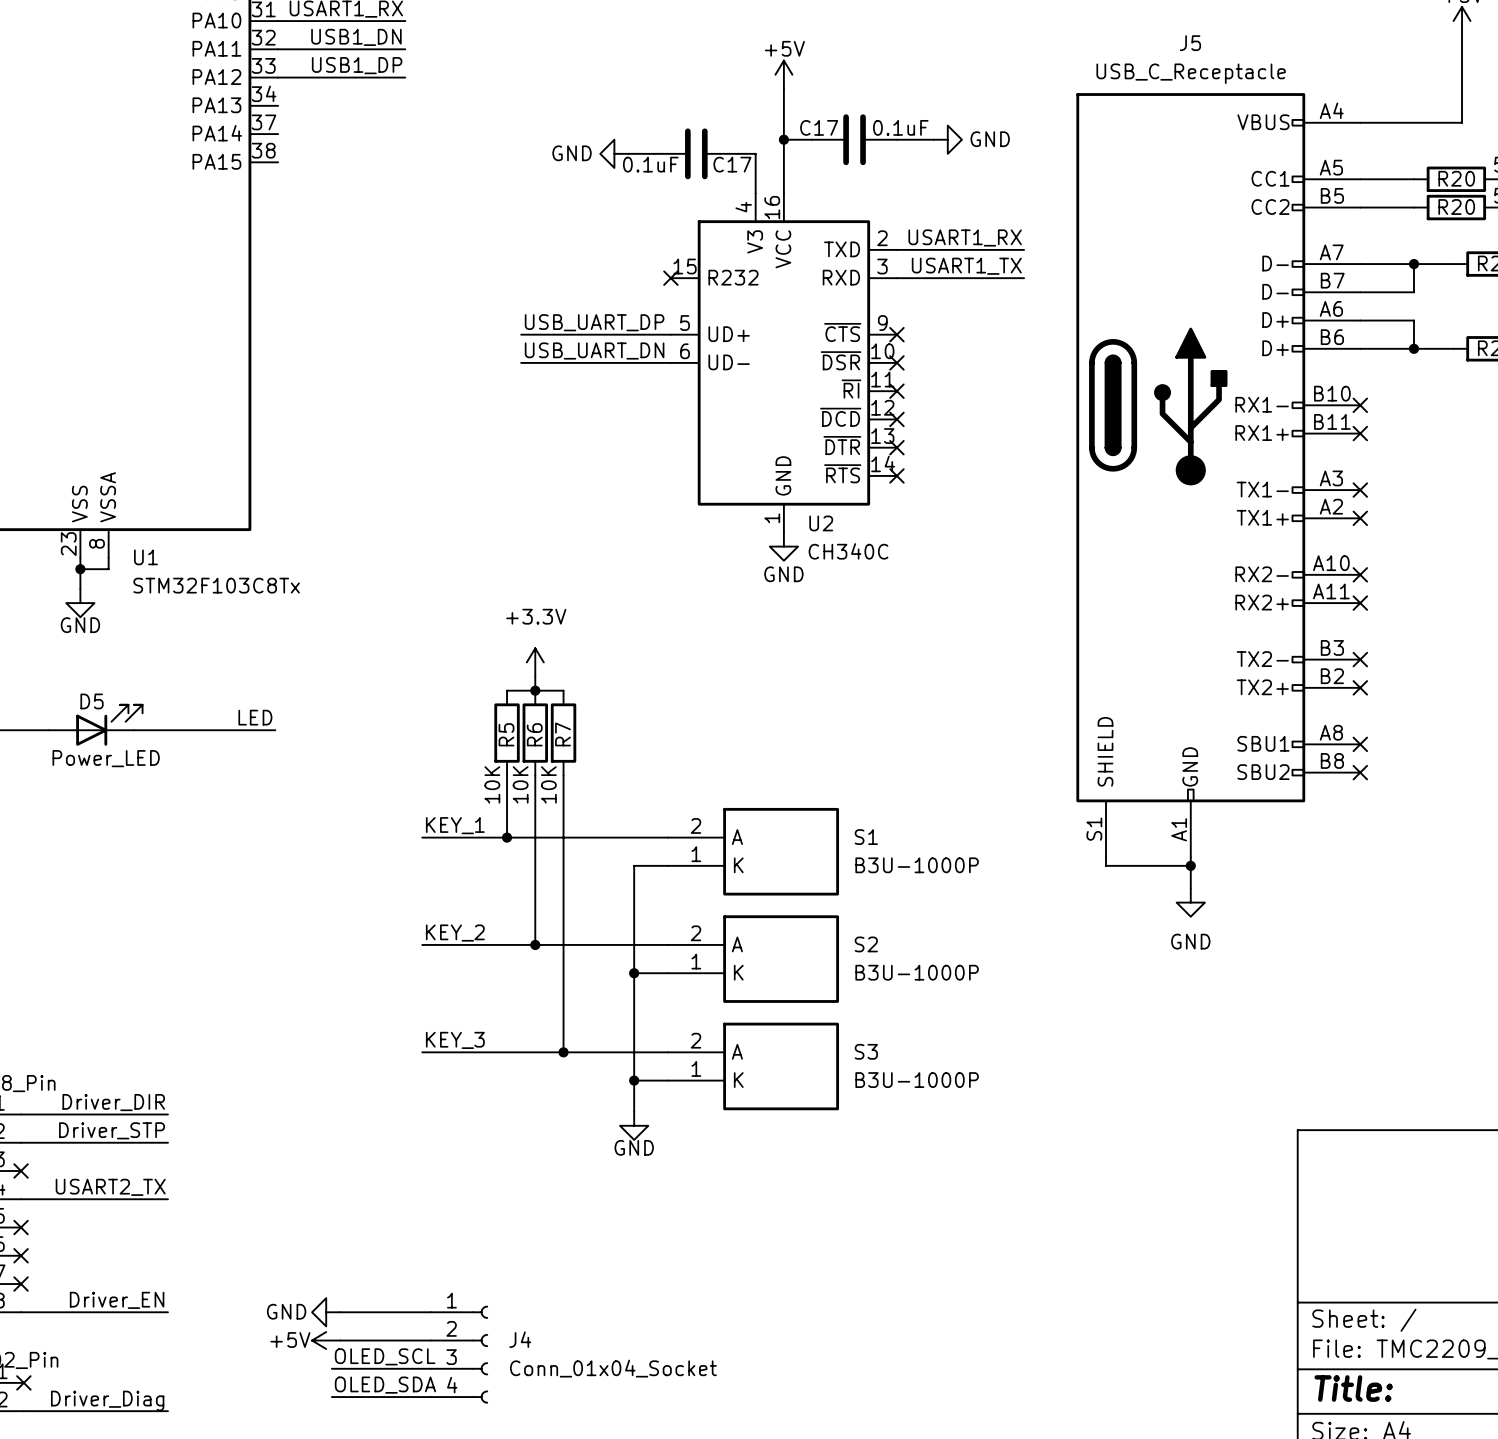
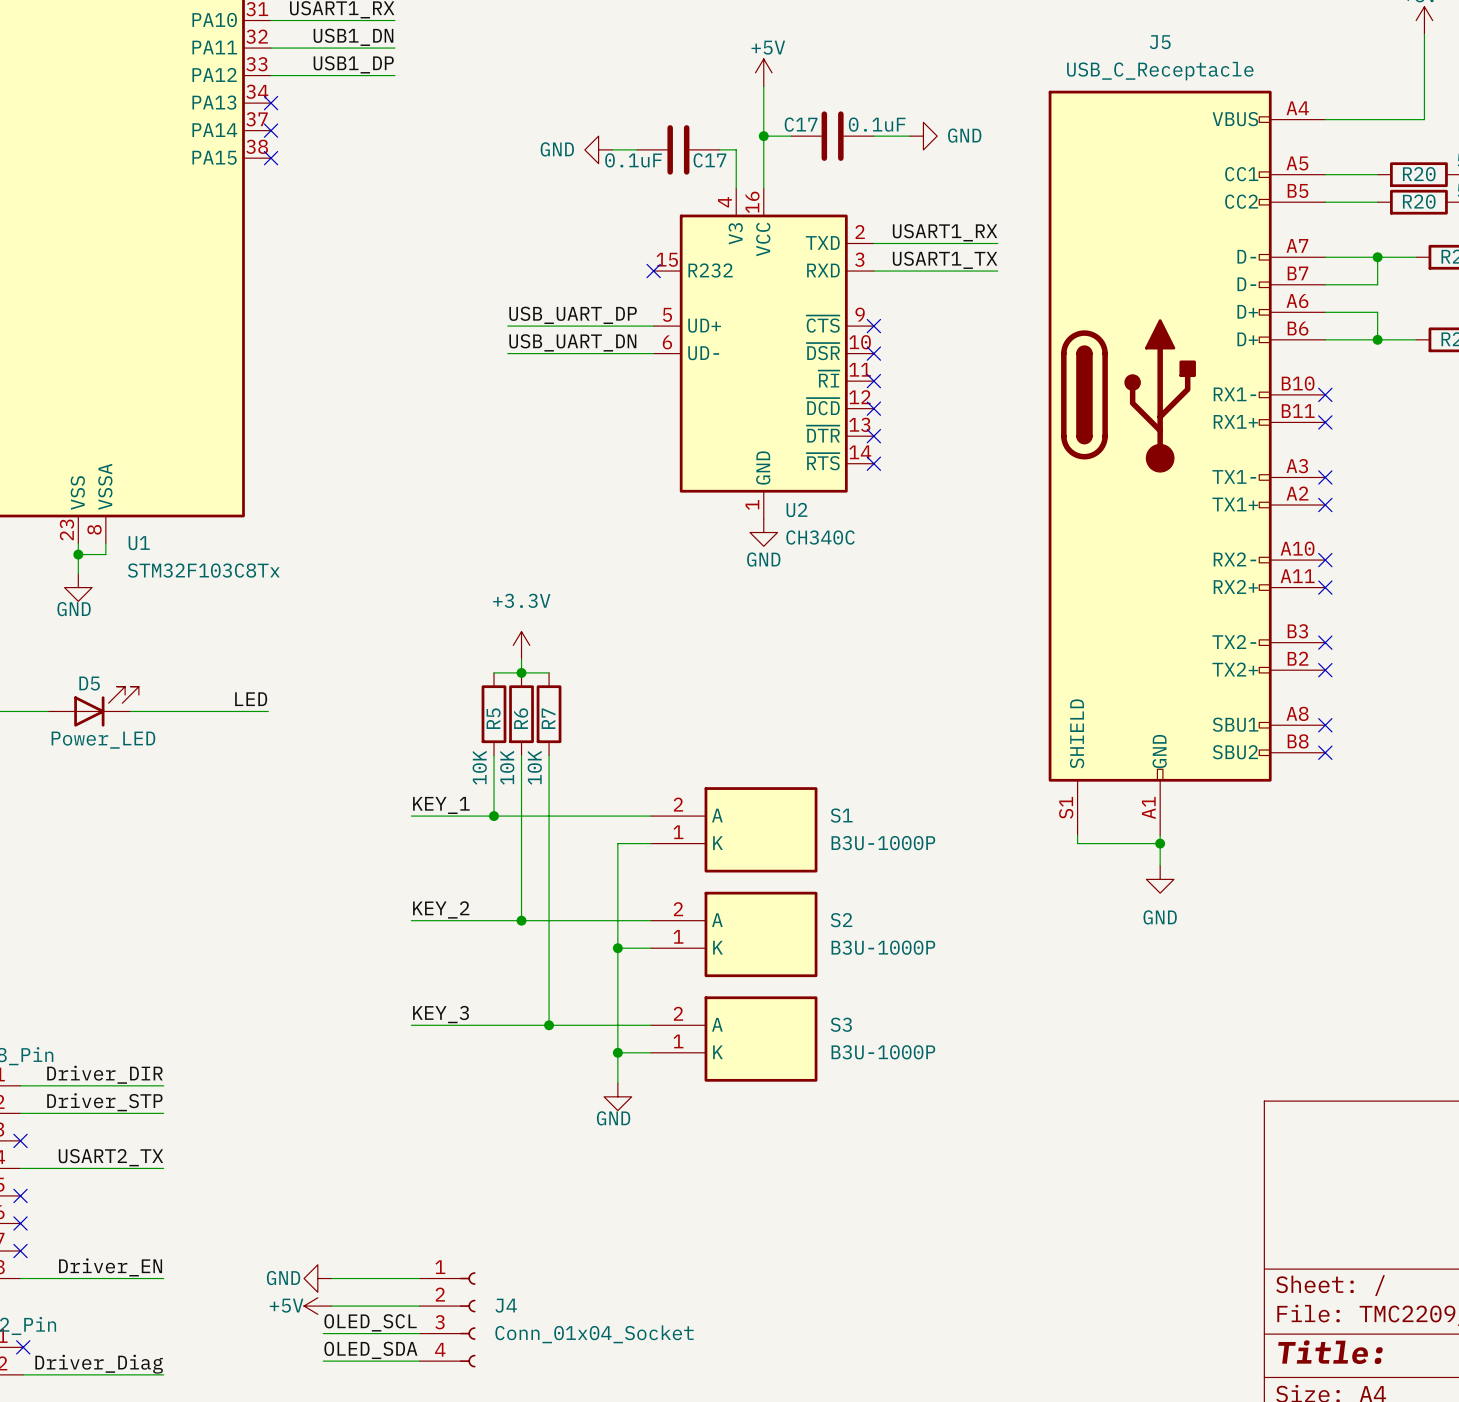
no-connect mark: none -> (271, 103)
no-connect mark: none -> (271, 130)
no-connect mark: none -> (271, 158)

